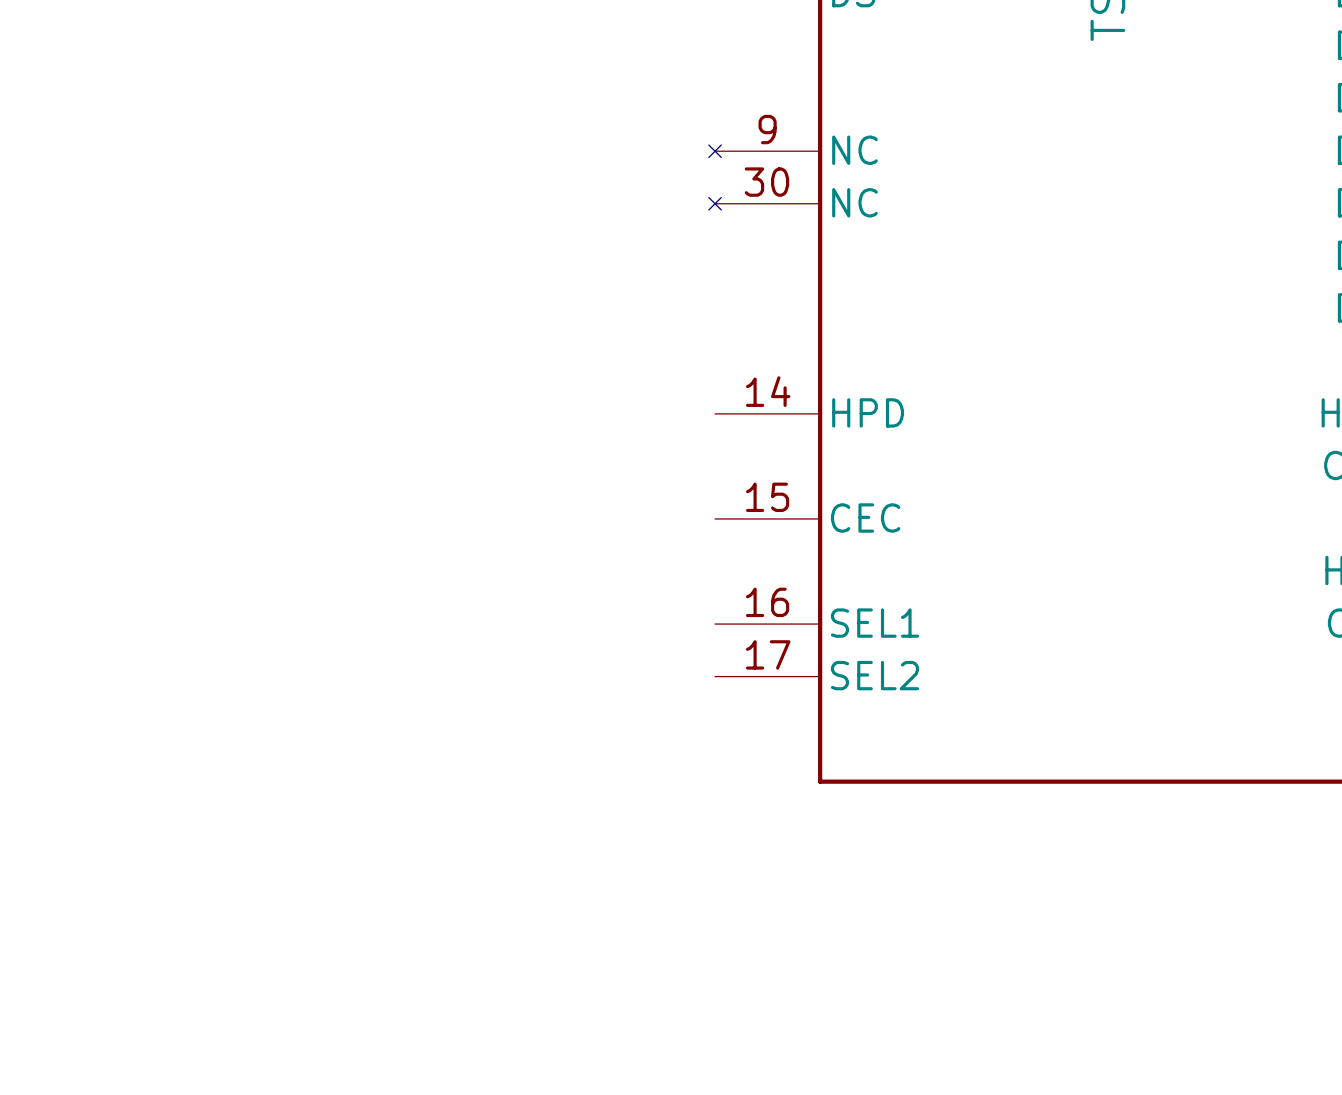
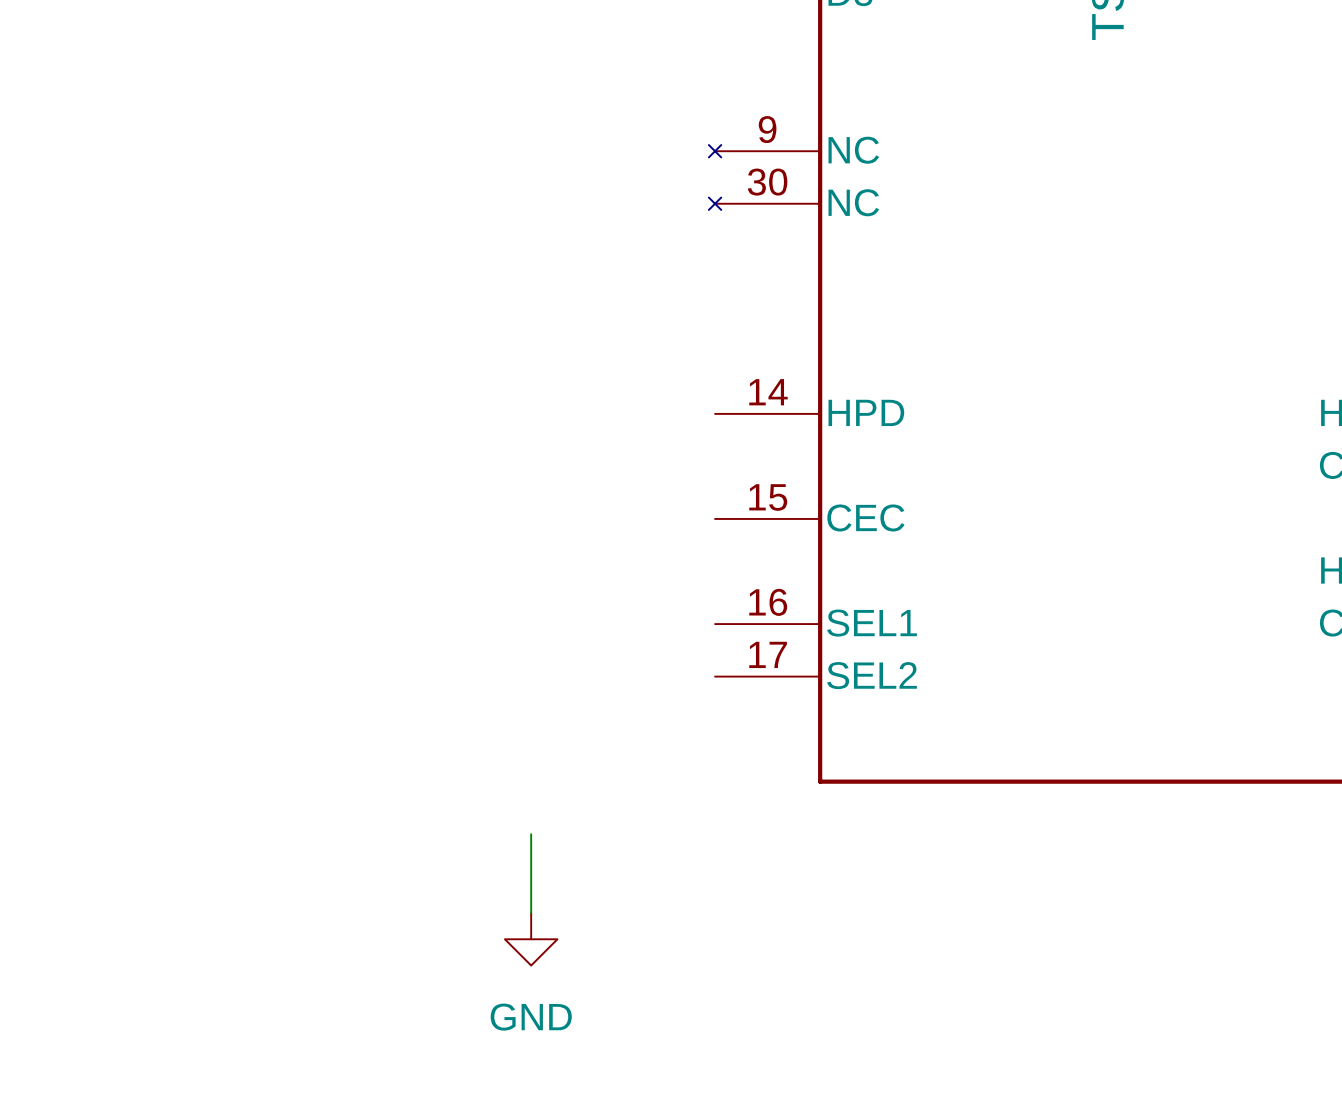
wire: none -> (531, 834) (531, 913)
power symbol: none -> GND (531, 939)

